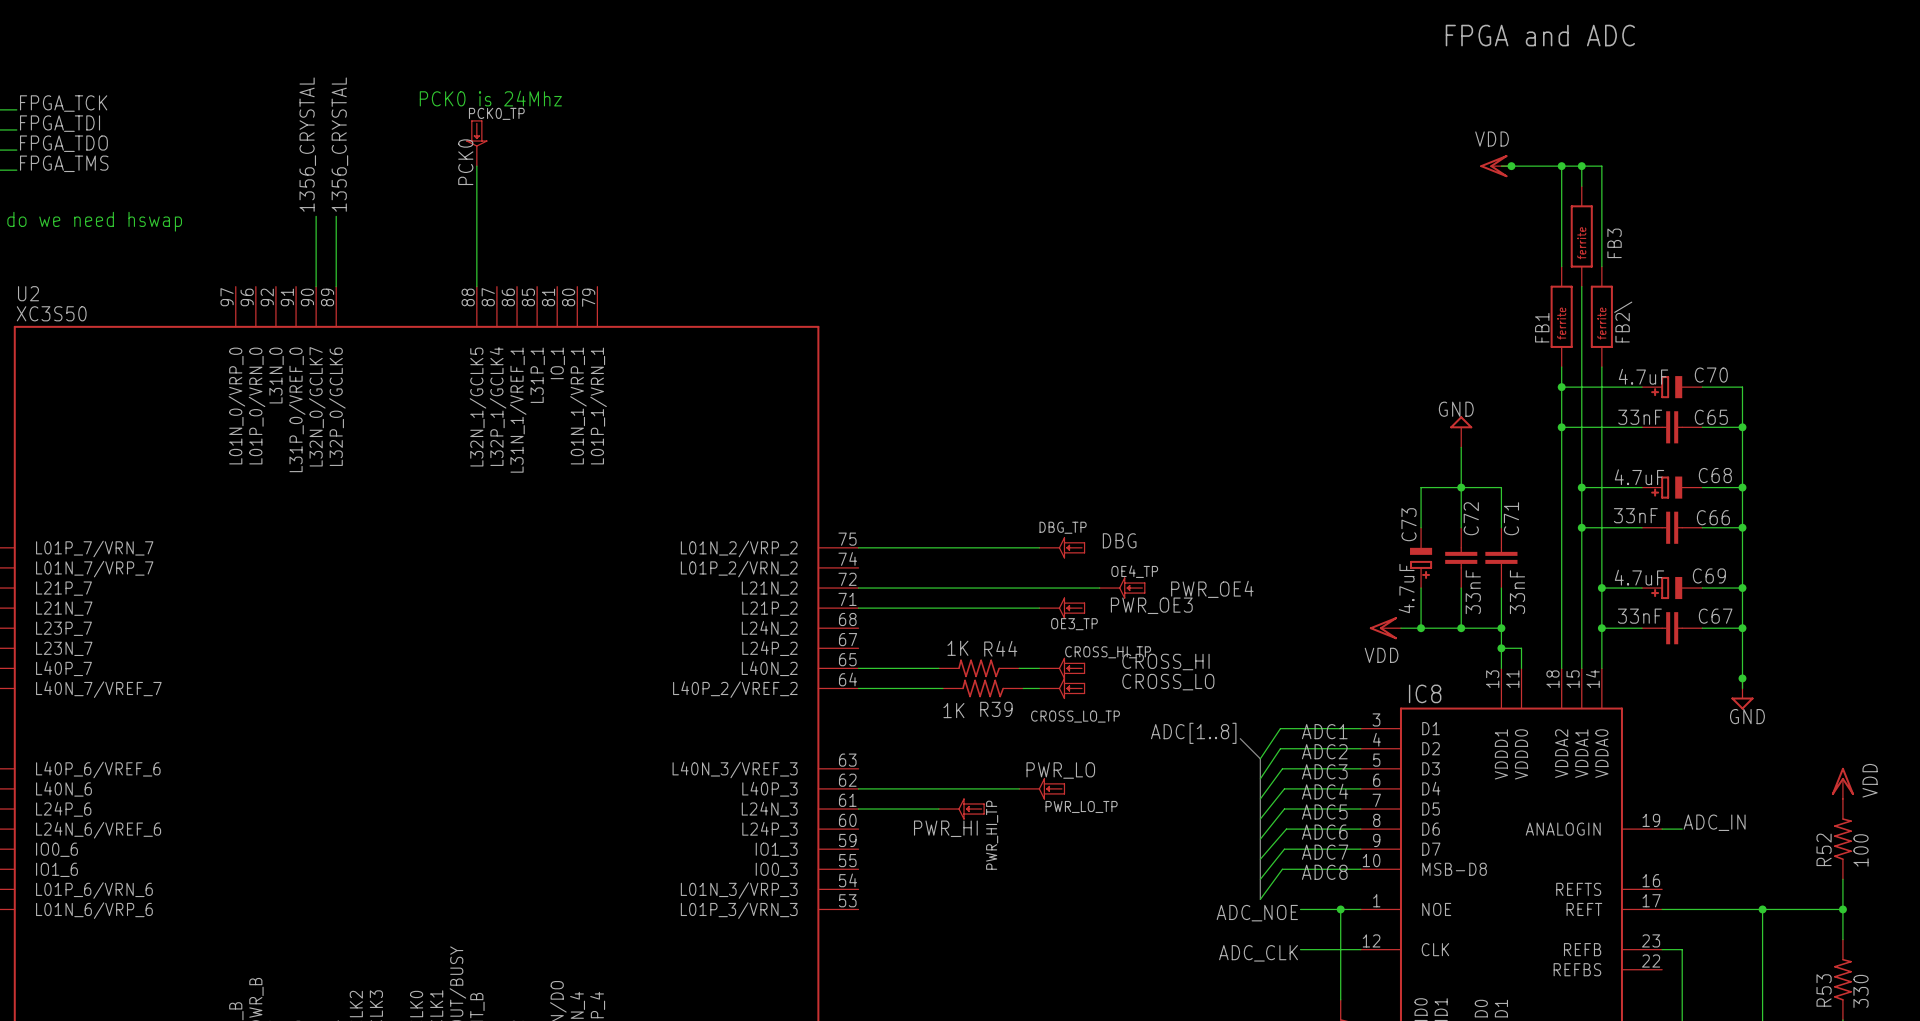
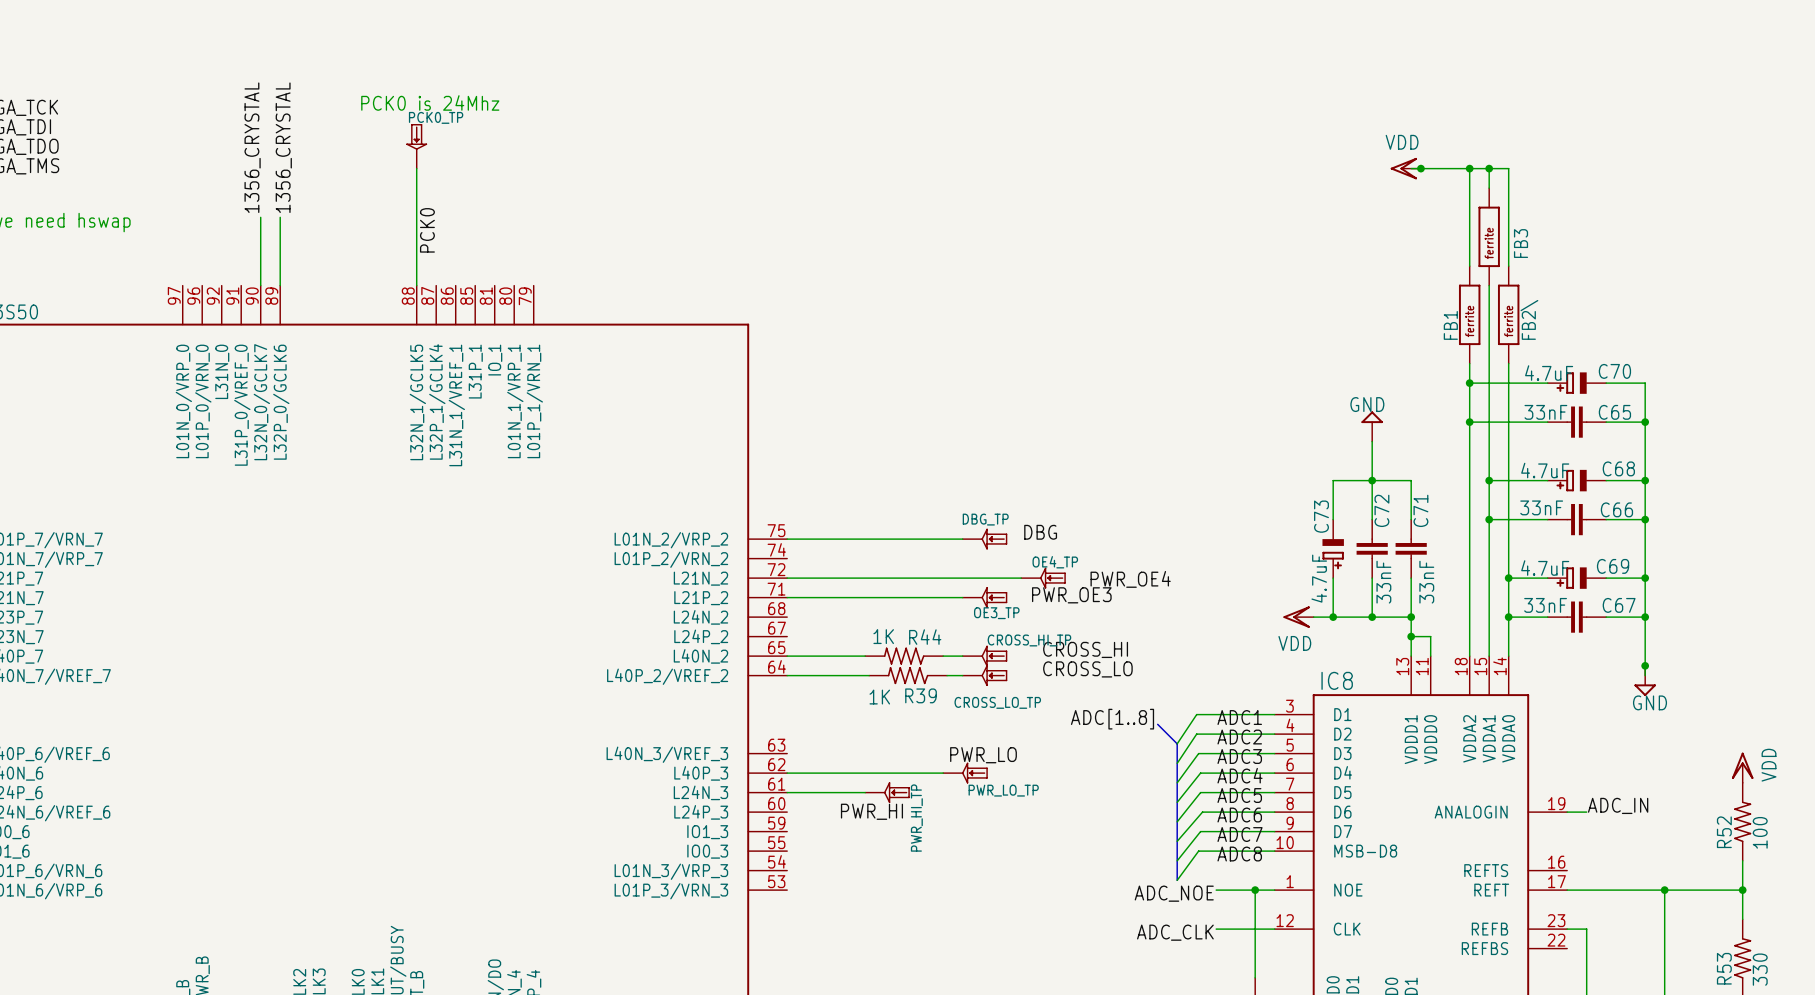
text: FPGA and ADC (1540, 35) -> none
label position: PCK0 (465, 162) -> PCK0 (427, 230)

